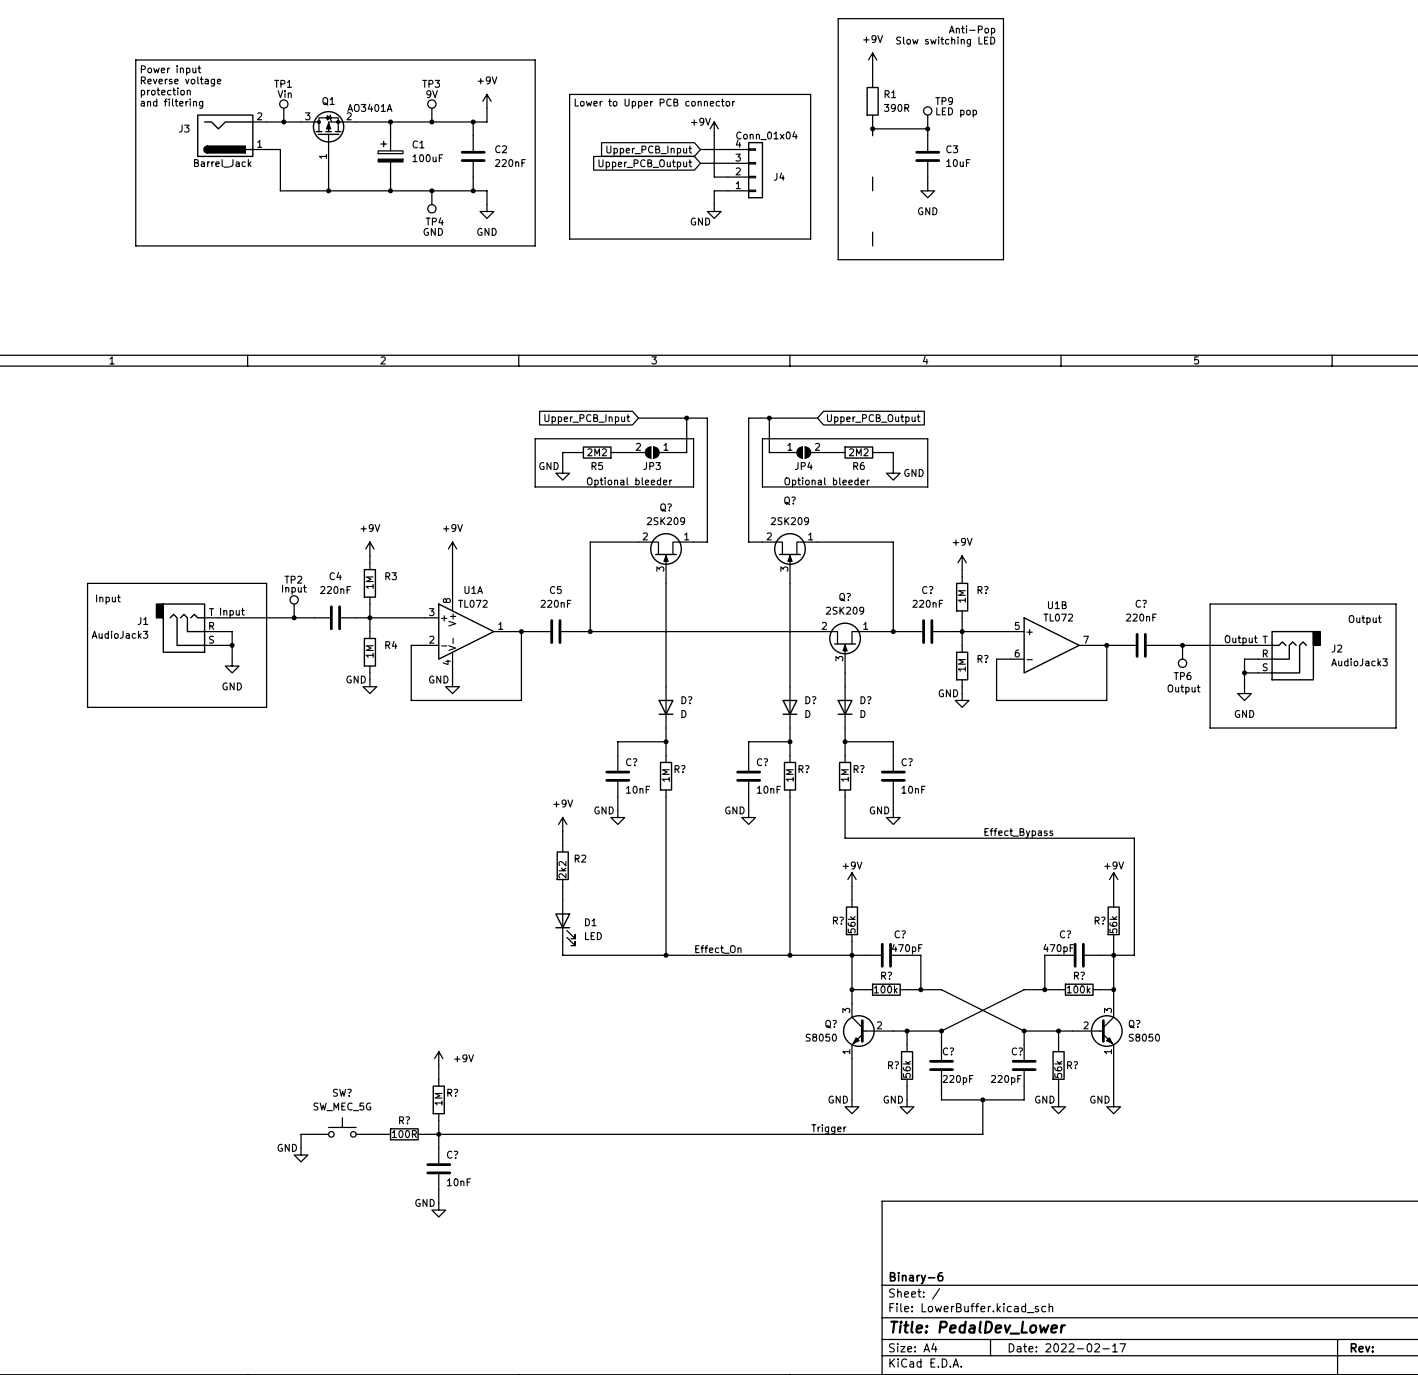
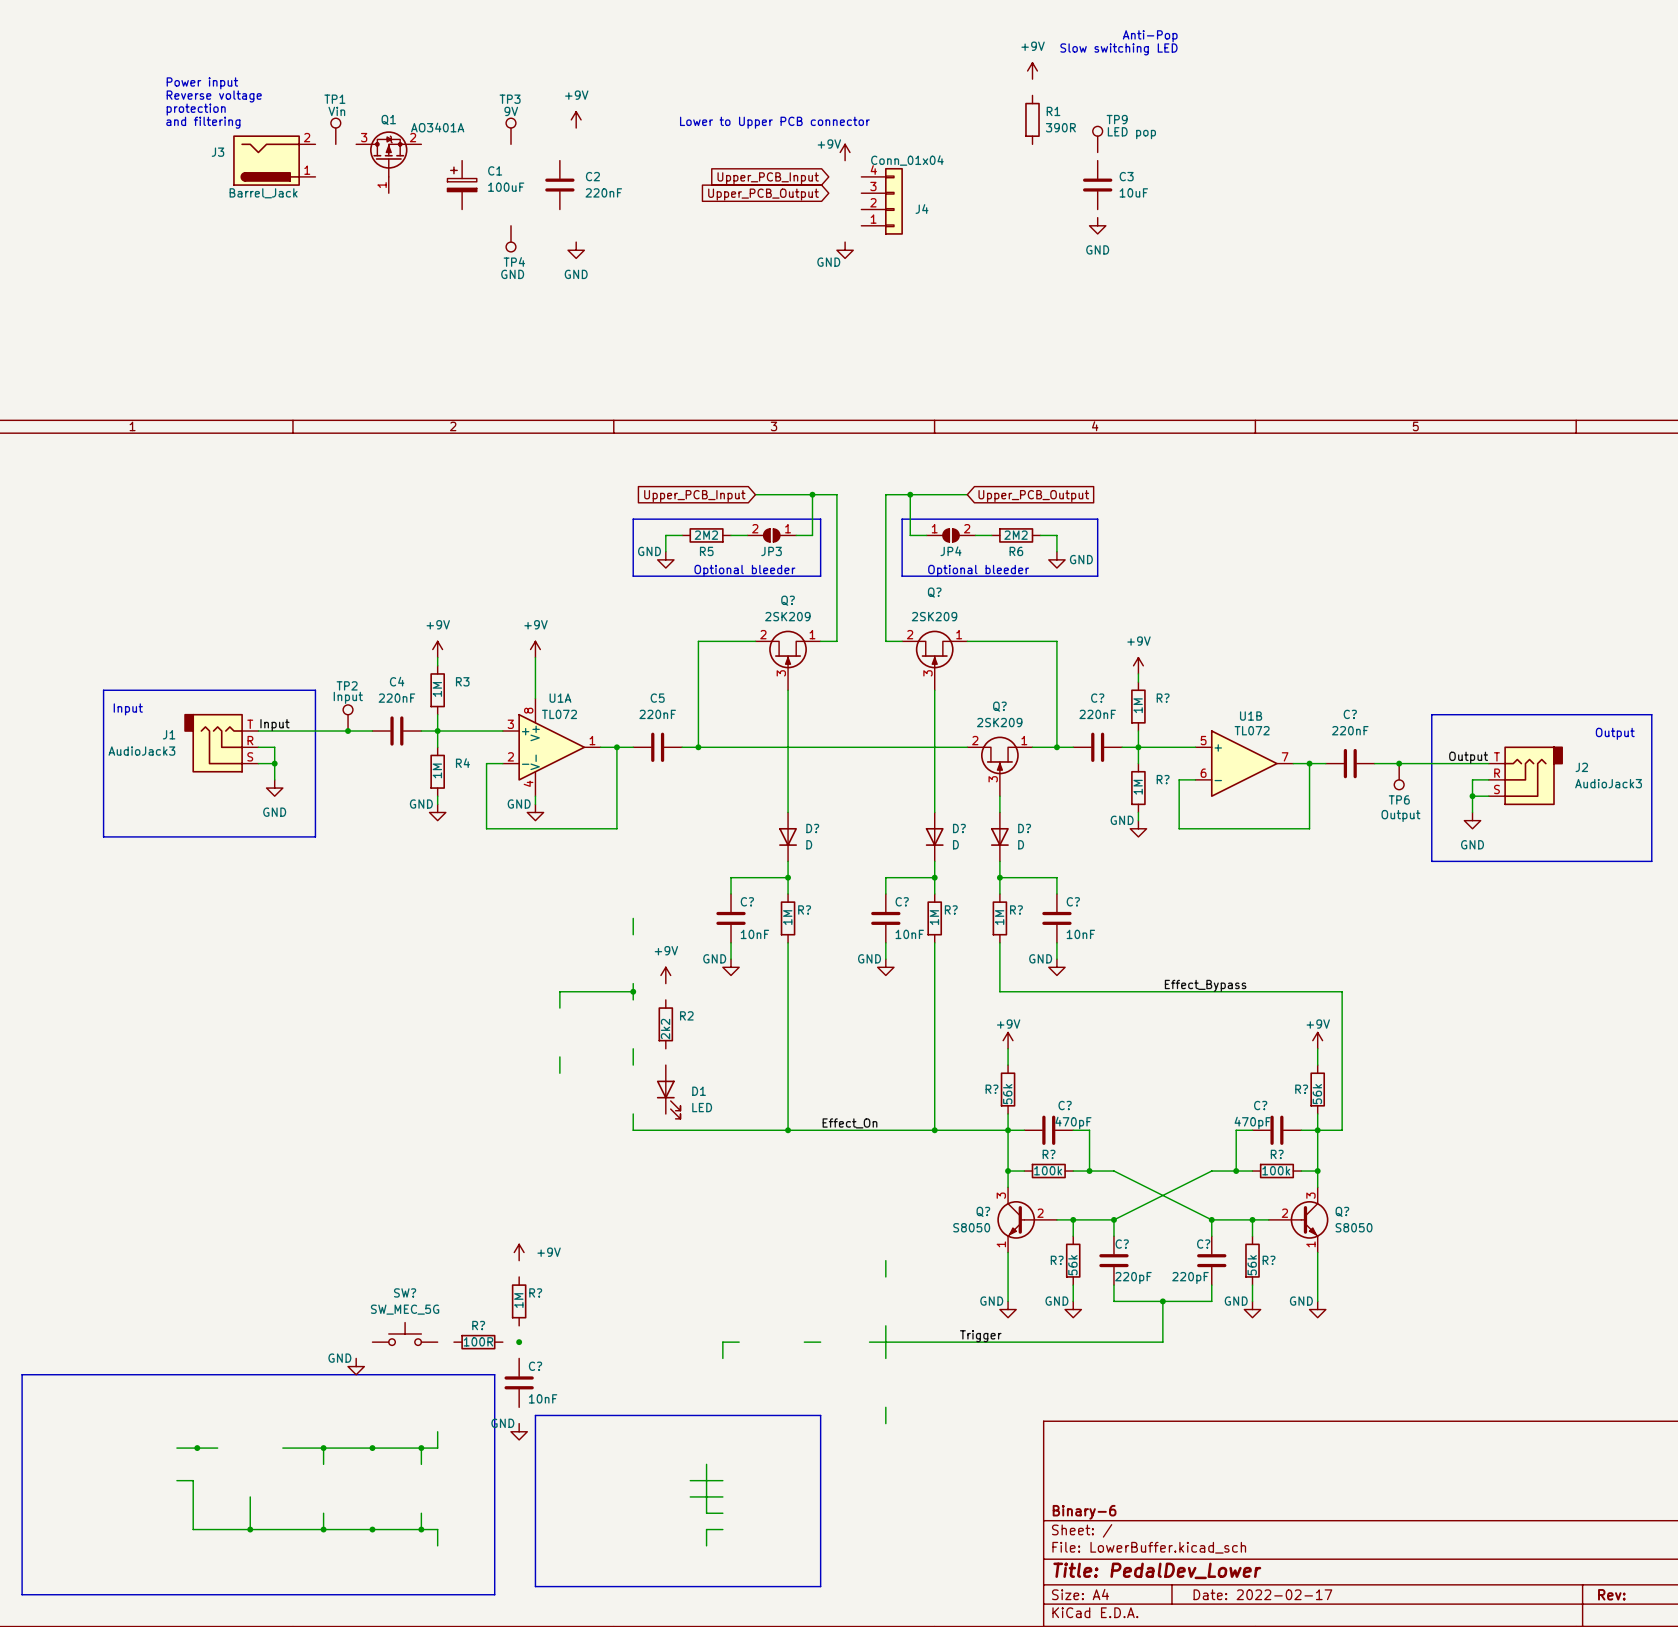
line: (838, 18) (1003, 18) (1003, 259) (838, 259) (838, 18) -> none
line: (135, 59) (535, 59) (535, 245) (135, 245) (135, 59) -> none
wire: (872, 66) (872, 80) -> none
line: (569, 94) (810, 94) (810, 239) (569, 239) (569, 94) -> none
wire: (486, 108) (486, 121) (356, 121) -> none
wire: (266, 121) (301, 121) -> none
junction: (283, 121) -> none
wire: (390, 121) (390, 135) -> none
junction: (390, 121) -> none
junction: (431, 121) -> none
wire: (473, 121) (473, 135) -> none
junction: (473, 121) -> none
wire: (872, 121) (872, 135) -> none
wire: (872, 128) (927, 128) (927, 135) -> none
junction: (872, 128) -> none
junction: (927, 128) -> none
wire: (714, 135) (714, 177) (728, 177) -> none
wire: (266, 149) (280, 149) (280, 190) (486, 190) (486, 204) -> none
wire: (700, 149) (728, 149) -> none
wire: (328, 163) (328, 190) -> none
wire: (700, 163) (728, 163) -> none
wire: (390, 177) (390, 190) -> none
wire: (473, 177) (473, 190) -> none
wire: (872, 177) (872, 190) -> none
wire: (927, 177) (927, 183) -> none
junction: (328, 190) -> none
junction: (390, 190) -> none
junction: (431, 190) -> none
junction: (473, 190) -> none
wire: (728, 190) (714, 190) (714, 204) -> none
wire: (872, 232) (872, 245) -> none
wire: (562, 831) (562, 845) -> (633, 918) (633, 934)
wire: none -> (633, 991) (559, 991) (559, 1008)
junction: none -> (633, 991)
wire: none -> (633, 1048) (633, 1065)
wire: (562, 886) (562, 900) -> (633, 983) (633, 999)
wire: none -> (559, 1056) (559, 1073)
wire: (562, 941) (562, 955) -> (633, 1113) (633, 1130) (665, 1130)
wire: (438, 1065) (438, 1079) -> none
wire: none -> (885, 1260) (885, 1276)
wire: (438, 1120) (438, 1148) -> none
wire: none -> (885, 1325) (885, 1358)
wire: (314, 1134) (301, 1134) (301, 1148) -> none
wire: (369, 1134) (383, 1134) -> none
wire: (424, 1134) (610, 1134) -> (722, 1358) (722, 1342)
wire: (624, 1134) (679, 1134) -> none
wire: (693, 1134) (734, 1134) -> none
line: none -> (22, 1374) (494, 1374) (494, 1594) (22, 1594) (22, 1374)
wire: (438, 1189) (438, 1203) -> (421, 1448) (421, 1464)
wire: none -> (885, 1407) (885, 1423)
line: none -> (535, 1415) (820, 1415) (820, 1586) (535, 1586) (535, 1415)
wire: none -> (437, 1431) (437, 1448) (282, 1448)
wire: none -> (176, 1448) (217, 1448)
junction: none -> (197, 1448)
wire: none -> (323, 1448) (323, 1464)
junction: none -> (323, 1448)
junction: none -> (372, 1448)
junction: none -> (421, 1448)
wire: none -> (706, 1464) (706, 1513) (722, 1513)
wire: none -> (176, 1480) (193, 1480) (193, 1529) (437, 1529) (437, 1545)
wire: none -> (690, 1480) (722, 1480)
wire: none -> (250, 1496) (250, 1529)
wire: none -> (690, 1496) (722, 1496)
wire: none -> (323, 1513) (323, 1529)
wire: none -> (421, 1513) (421, 1529)
junction: none -> (250, 1529)
junction: none -> (323, 1529)
junction: none -> (372, 1529)
junction: none -> (421, 1529)
wire: none -> (722, 1529) (706, 1529) (706, 1545)

